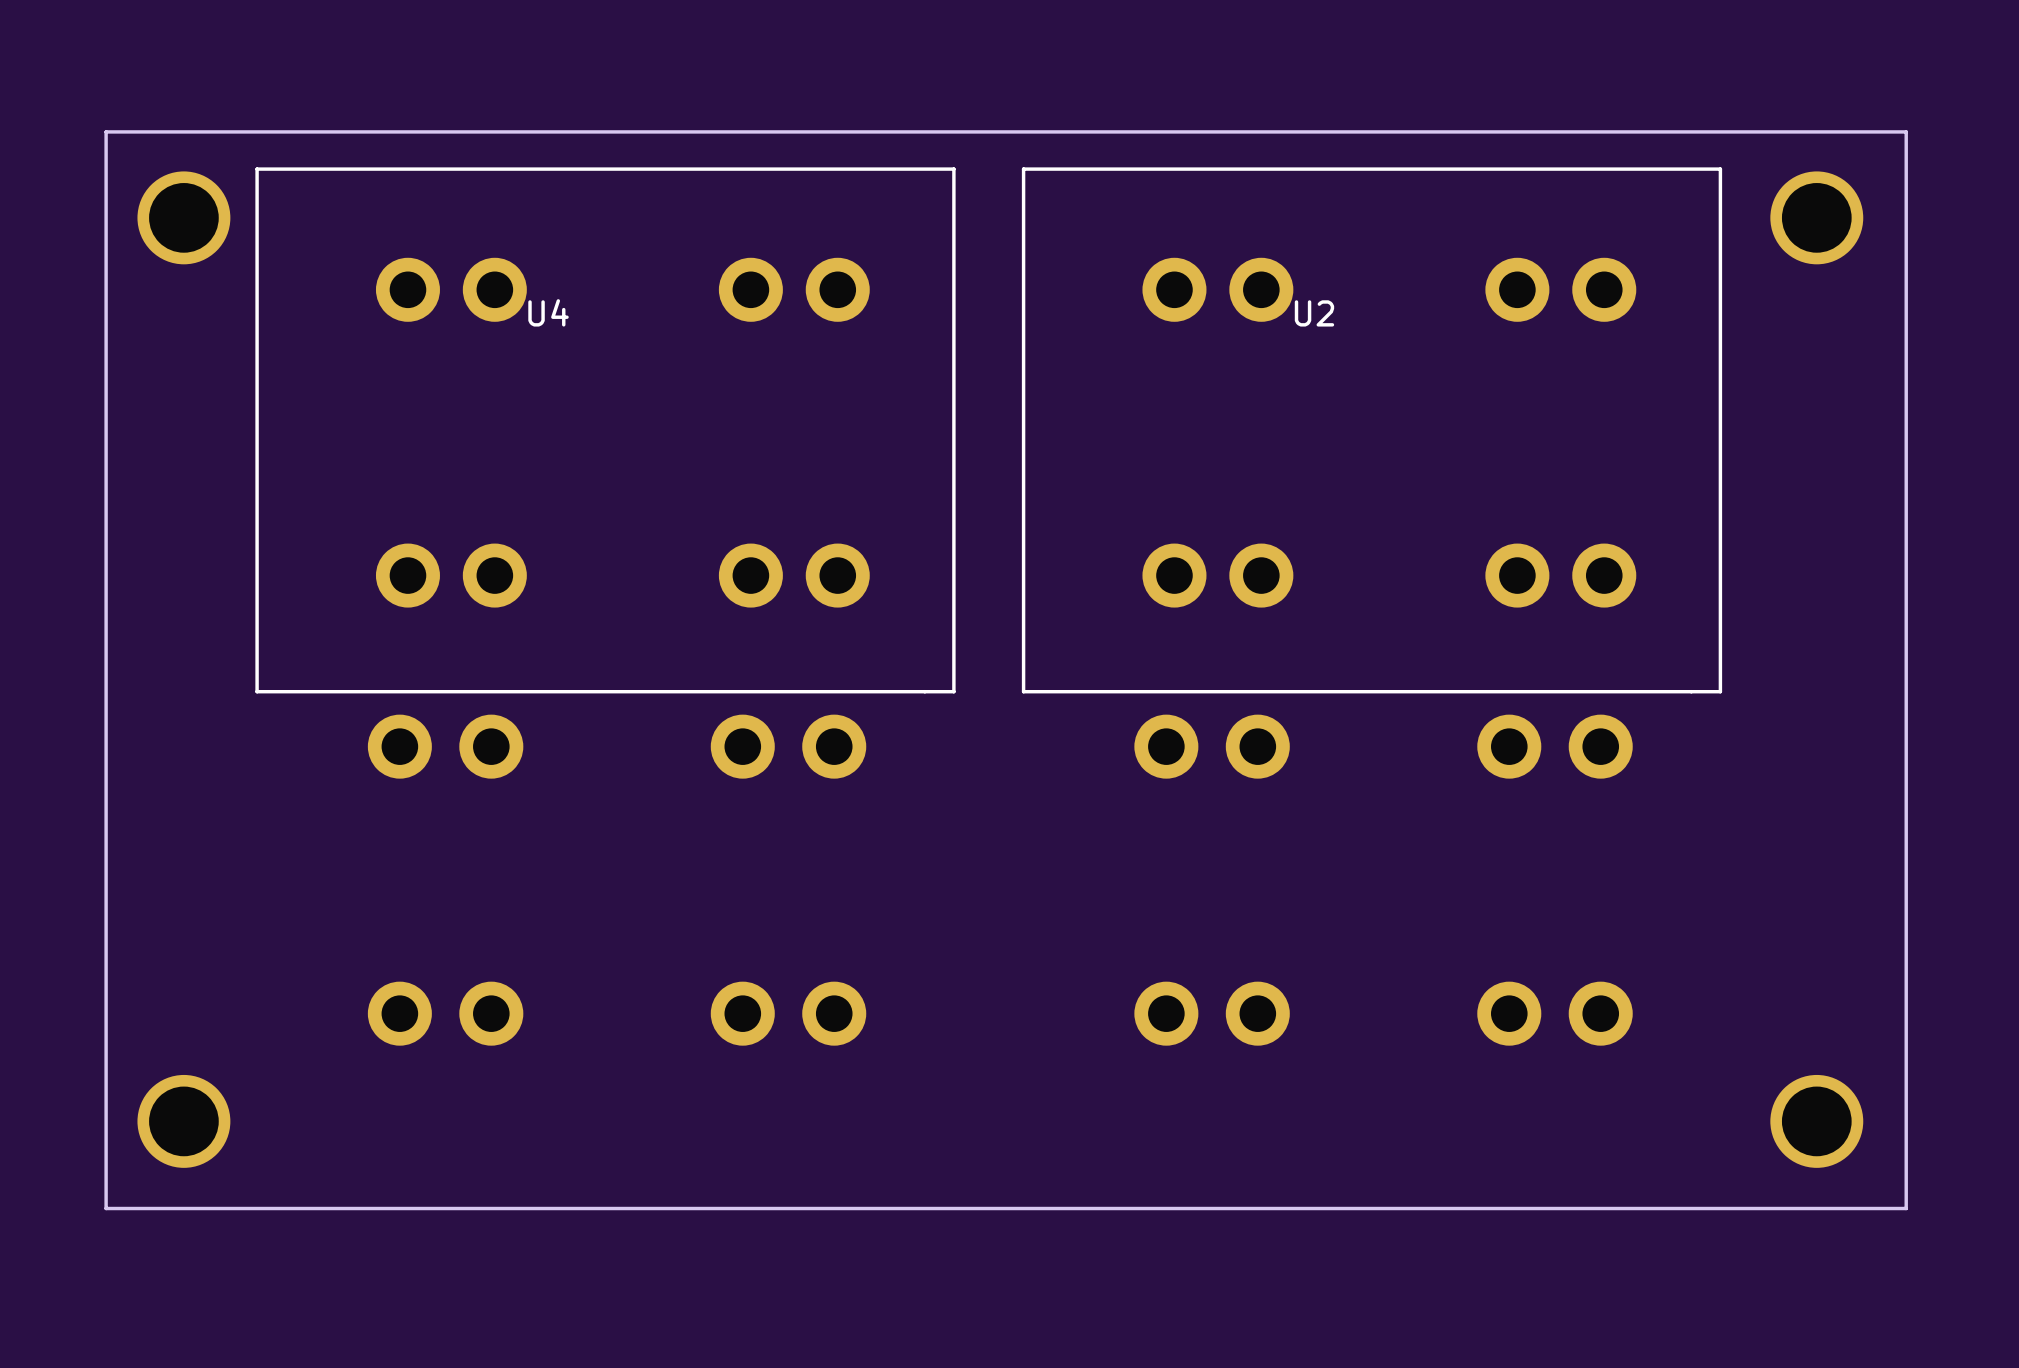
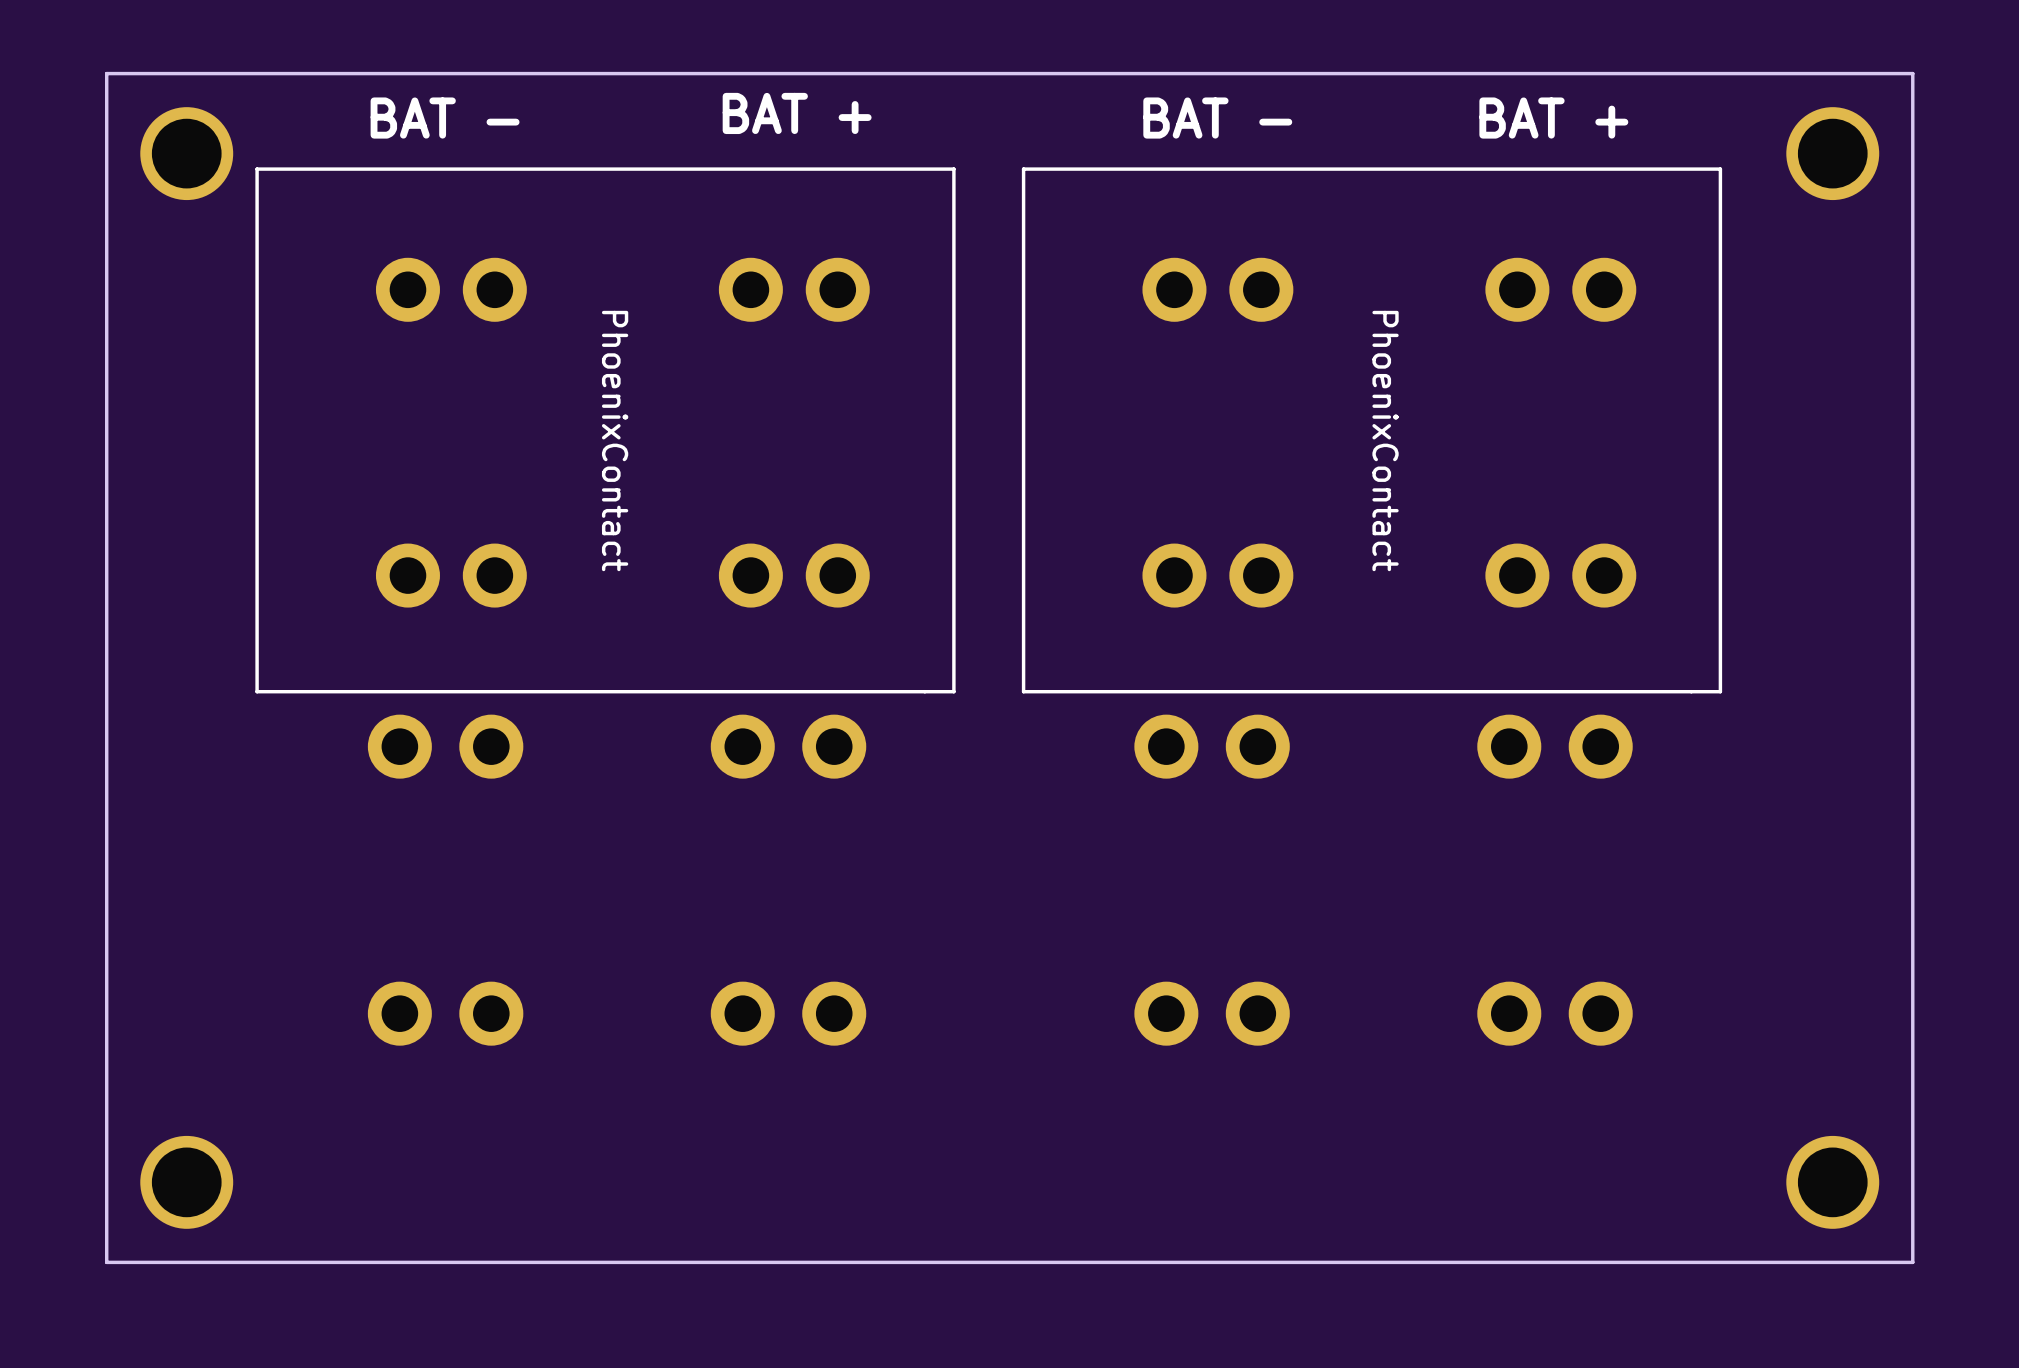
text: none -> BAT + (797, 113)
text: none -> BAT - (445, 118)
text: none -> BAT - (1217, 118)
text: none -> BAT + (1553, 118)
board edge: (1906, 131) (1906, 1208) (106, 1208) (106, 131) (1906, 131) -> (1912, 73) (1912, 1262) (106, 1262) (106, 73) (1912, 73)
part position: (183, 217) -> (186, 153)
part position: (1816, 217) -> (1832, 153)
U4 name: U4 (548, 312) -> PhoenixContact (615, 441)
U2 name: U2 (1314, 313) -> PhoenixContact (1385, 441)
part position: (183, 1121) -> (186, 1182)
part position: (1816, 1121) -> (1832, 1182)

